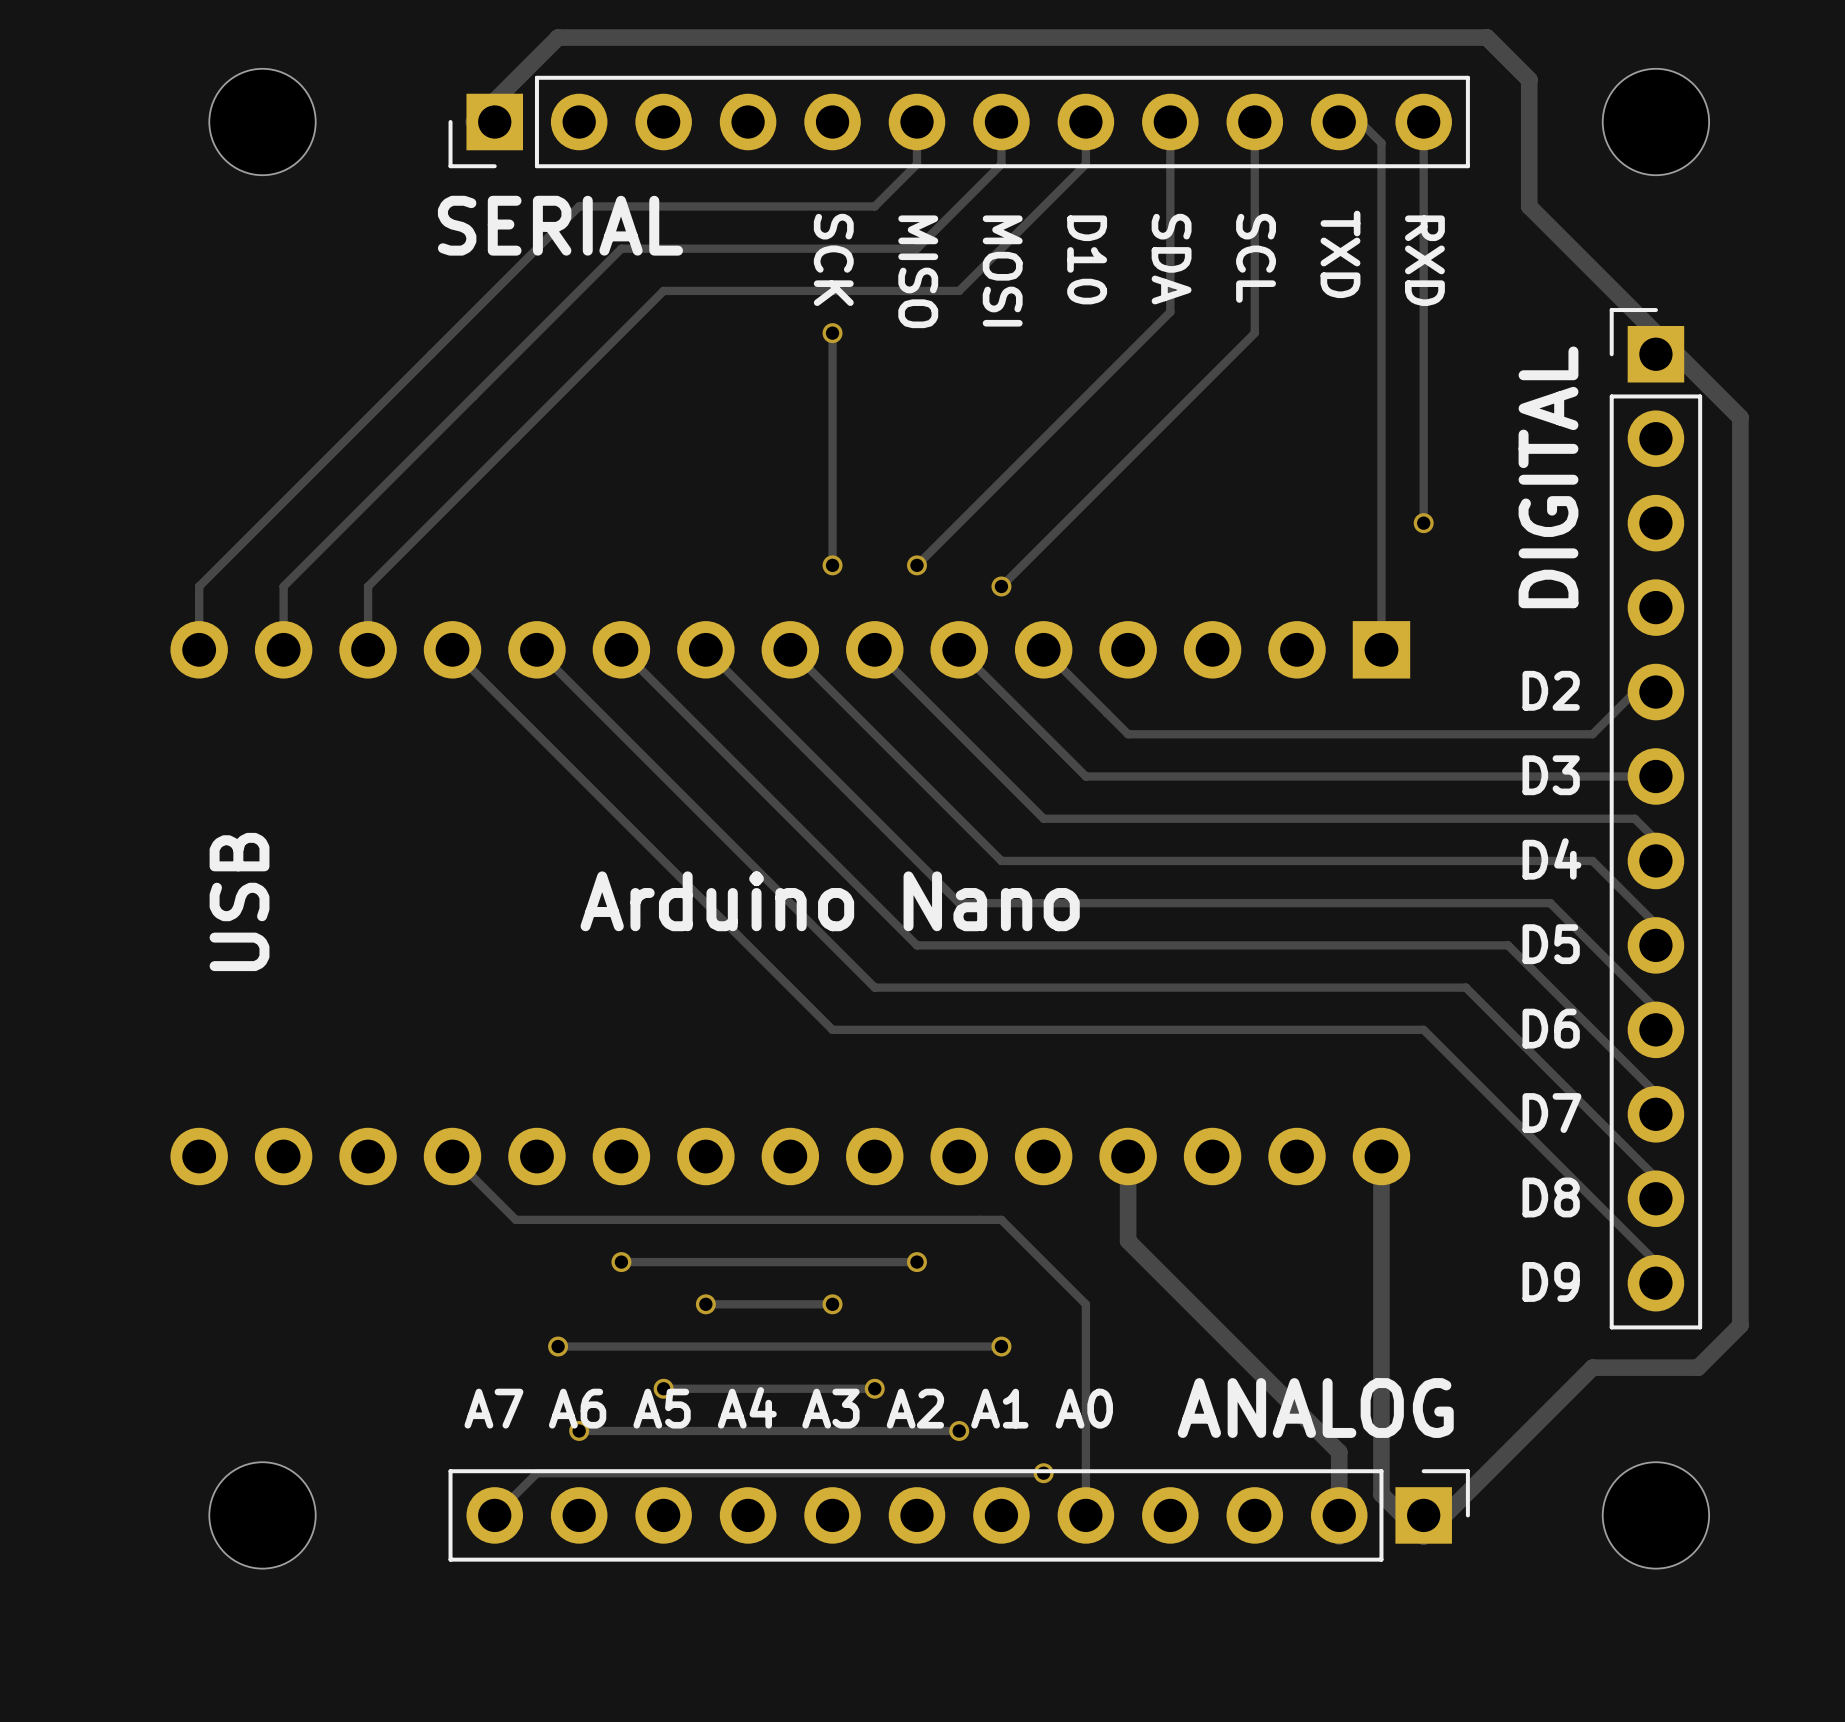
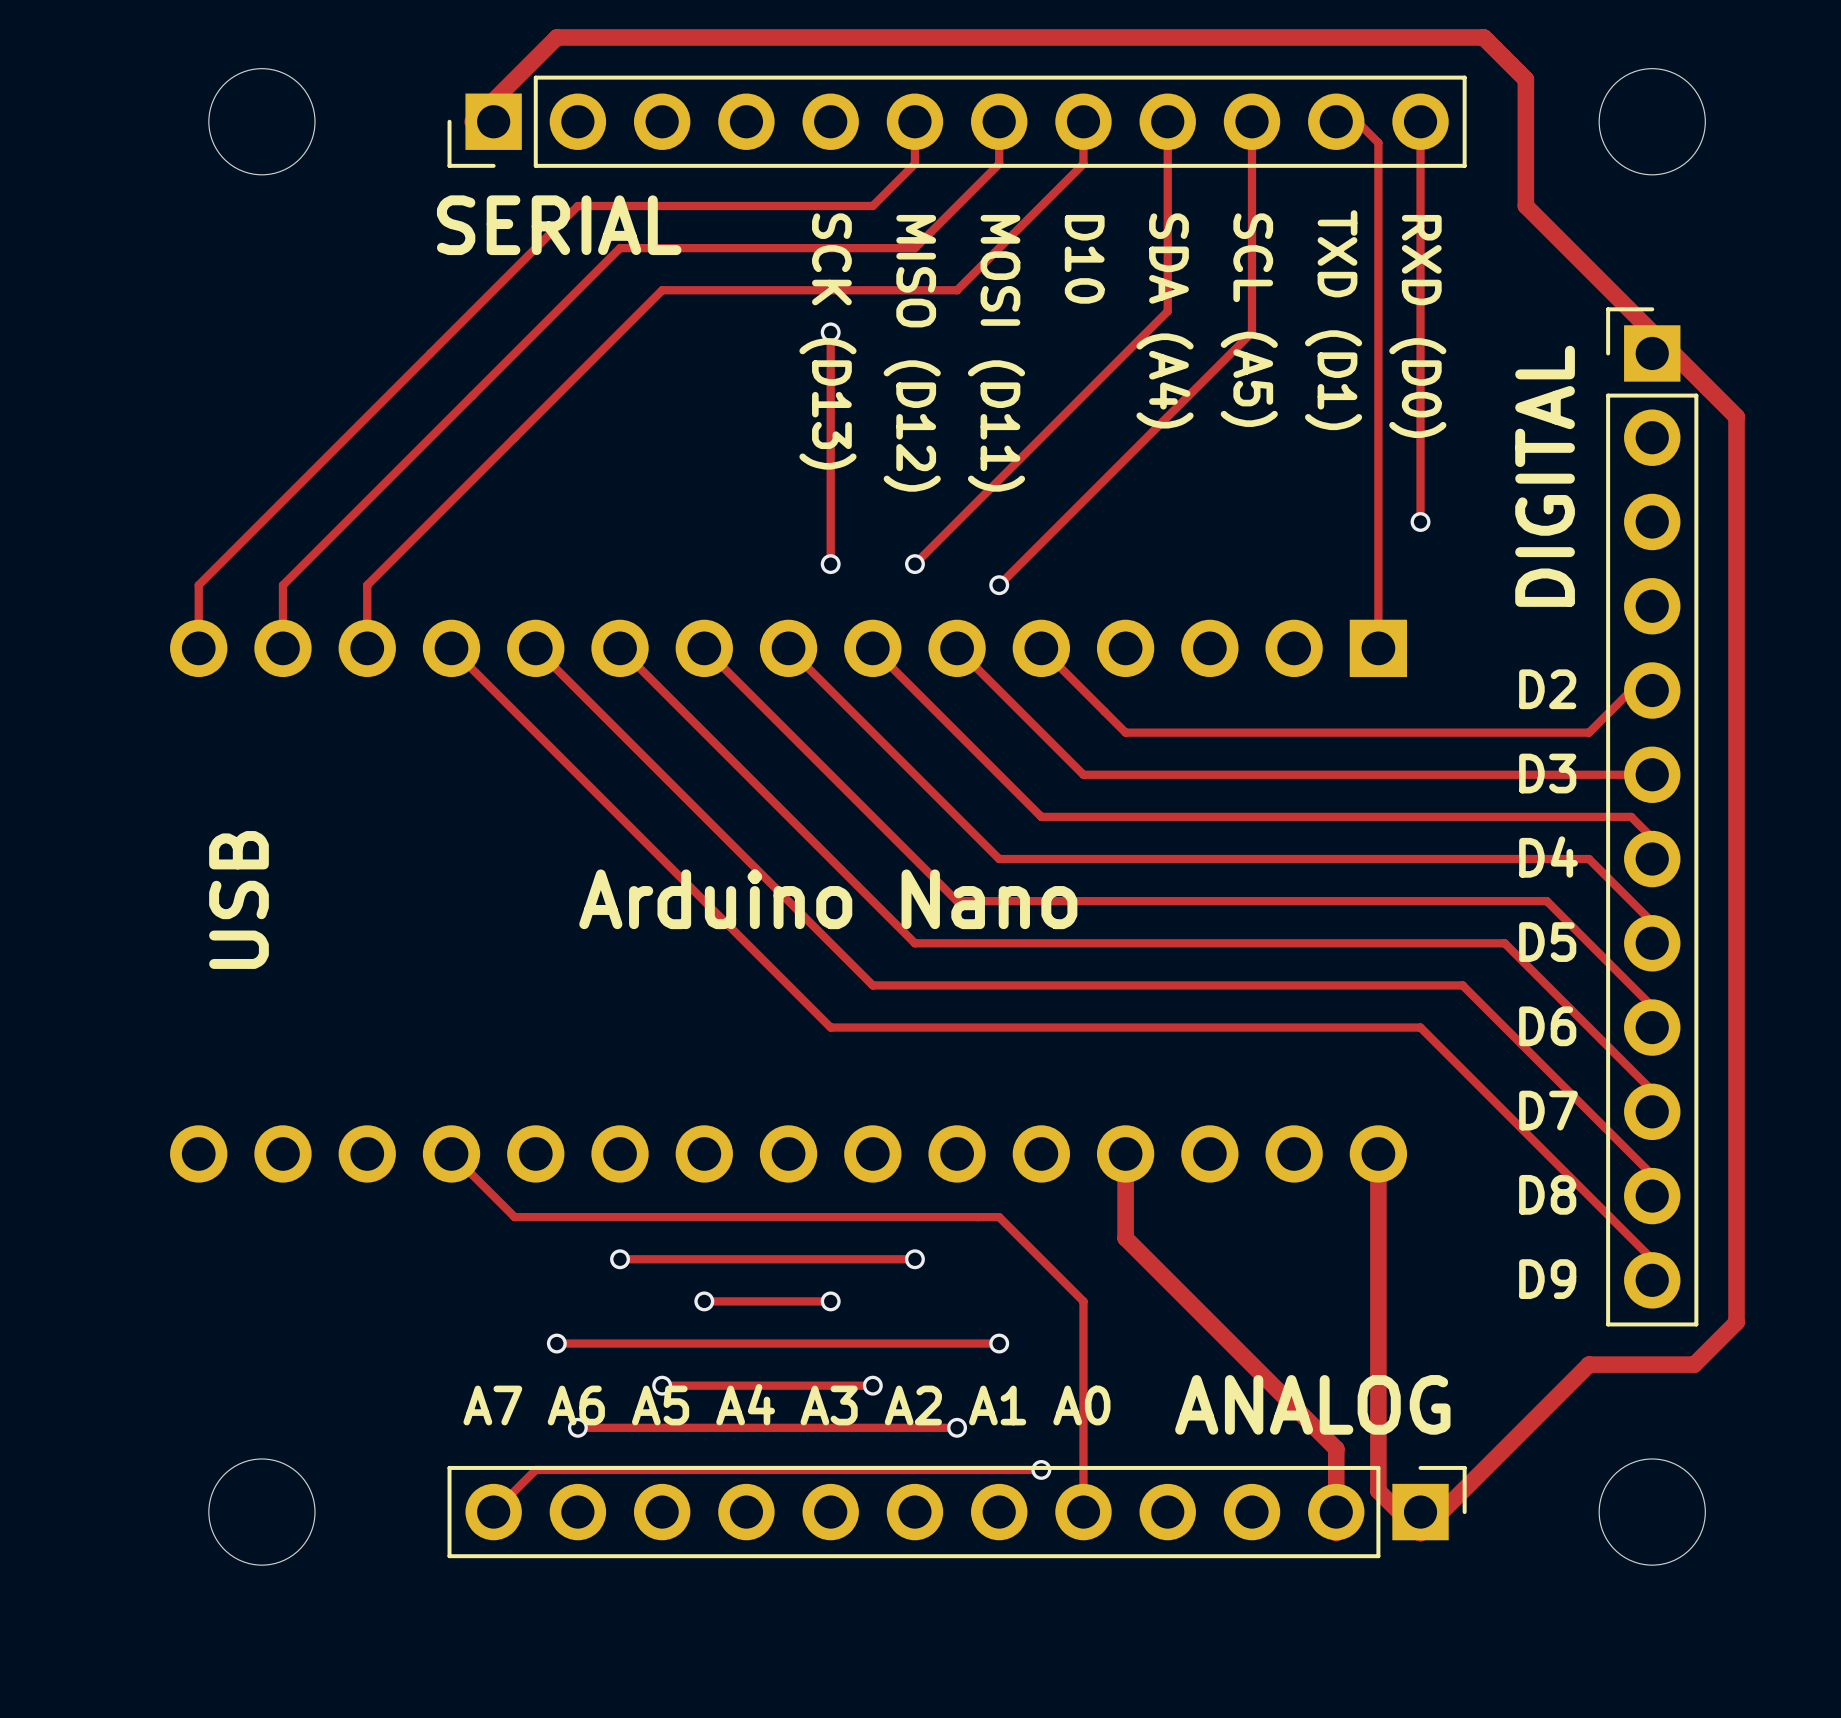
text: TXD (1340, 254) -> TXD (D1) (1333, 320)
text: SCL (1256, 258) -> SCL (A5) (1249, 320)
text: SCK (833, 259) -> SCK (D13) (827, 341)
text: SDA (1171, 259) -> SDA (A4) (1165, 320)
text: RXD (1424, 260) -> RXD (D0) (1417, 326)
text: MOSI (1002, 270) -> MOSI (D11) (996, 353)
text: MISO (918, 271) -> MISO (D12) (912, 353)

